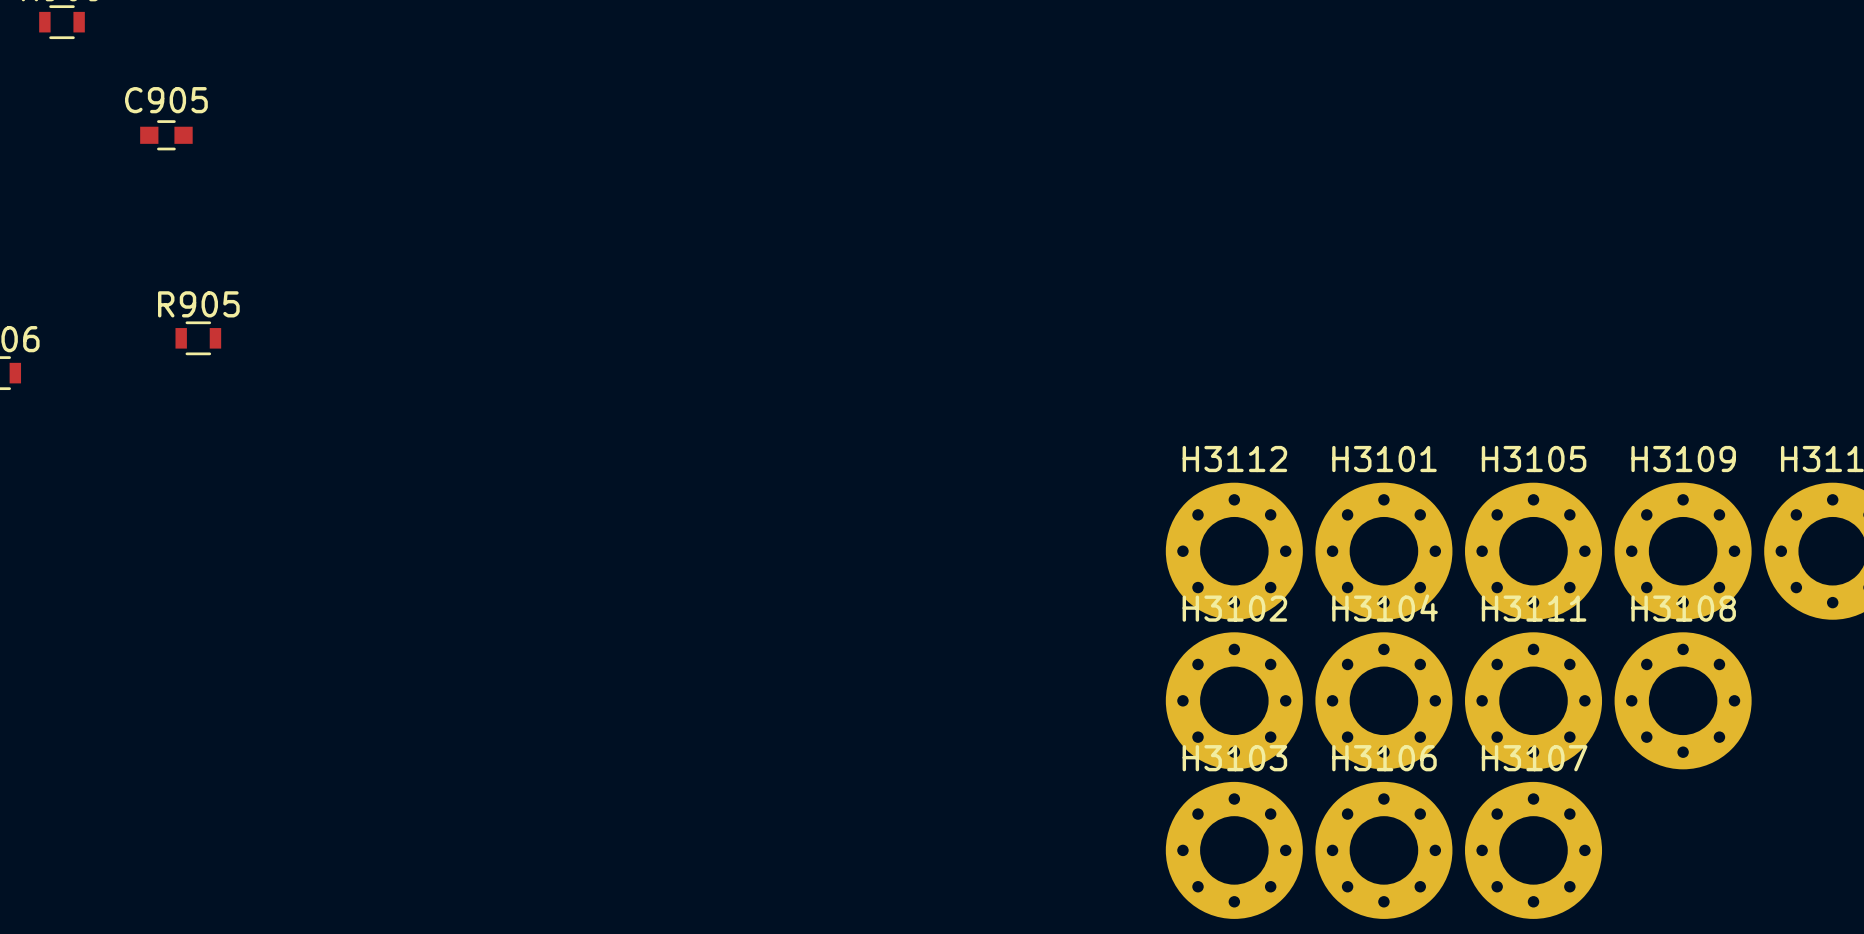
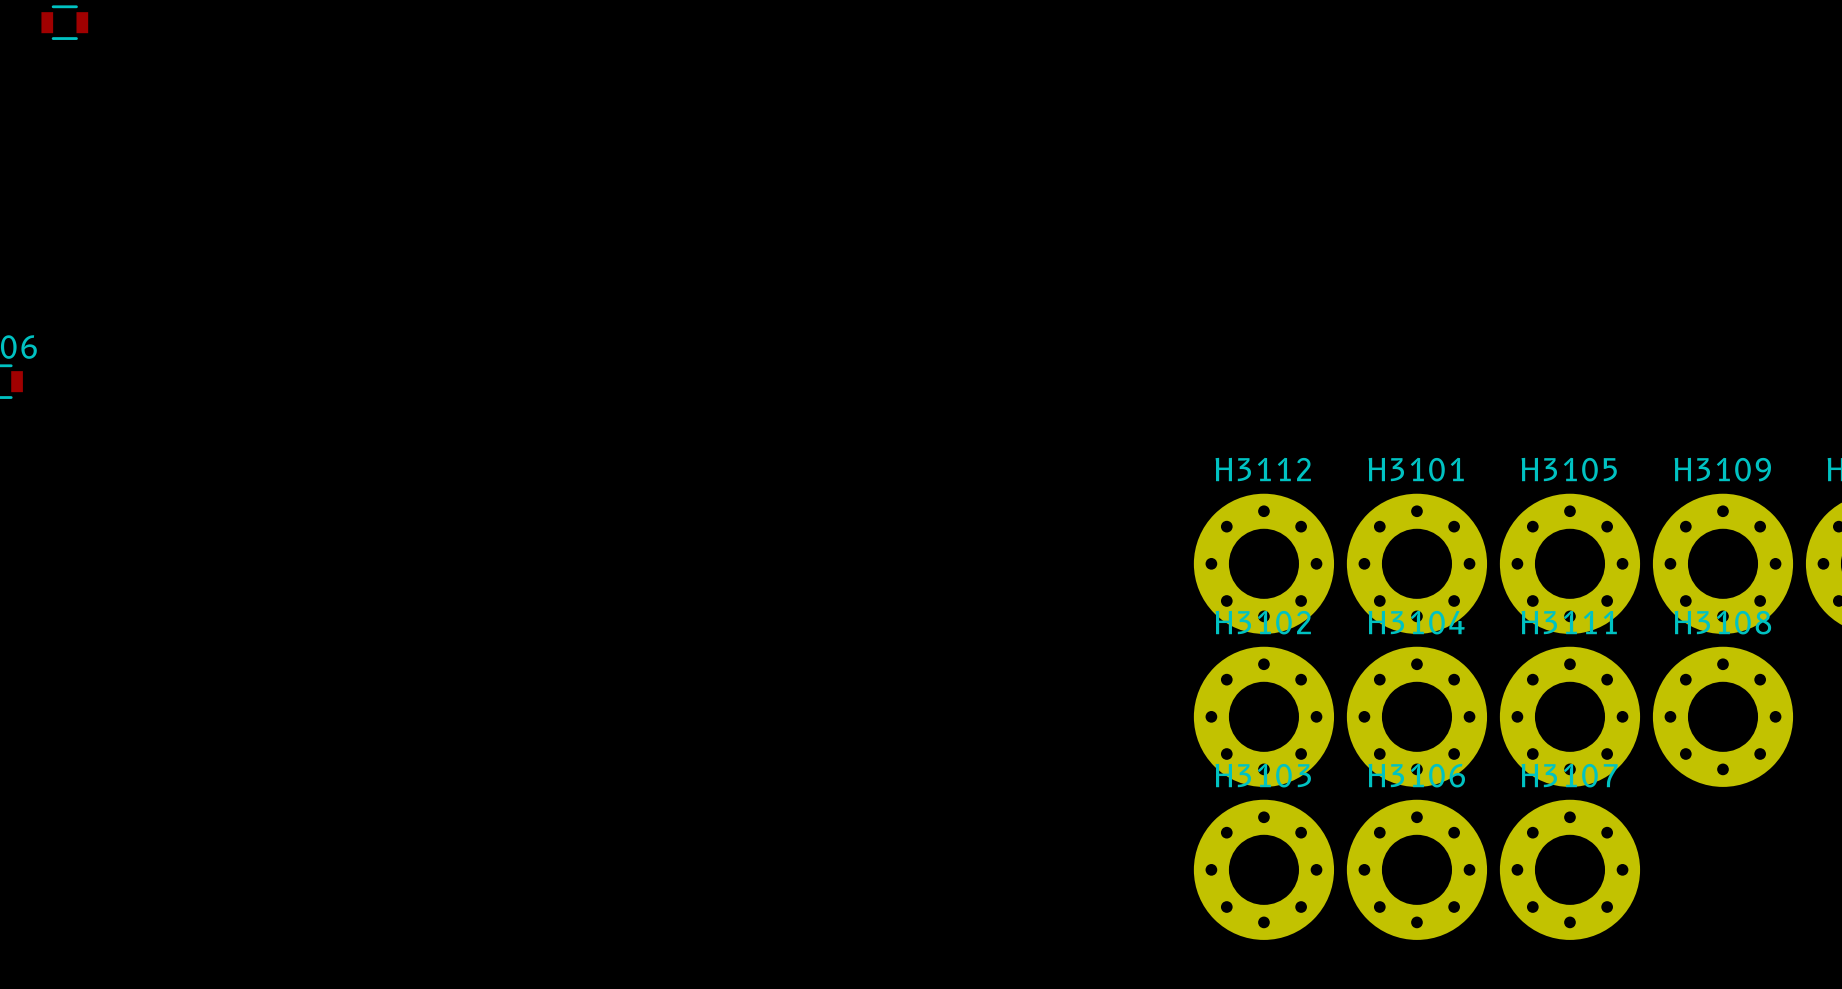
C905: (166, 135) -> none
R905: (198, 338) -> none

